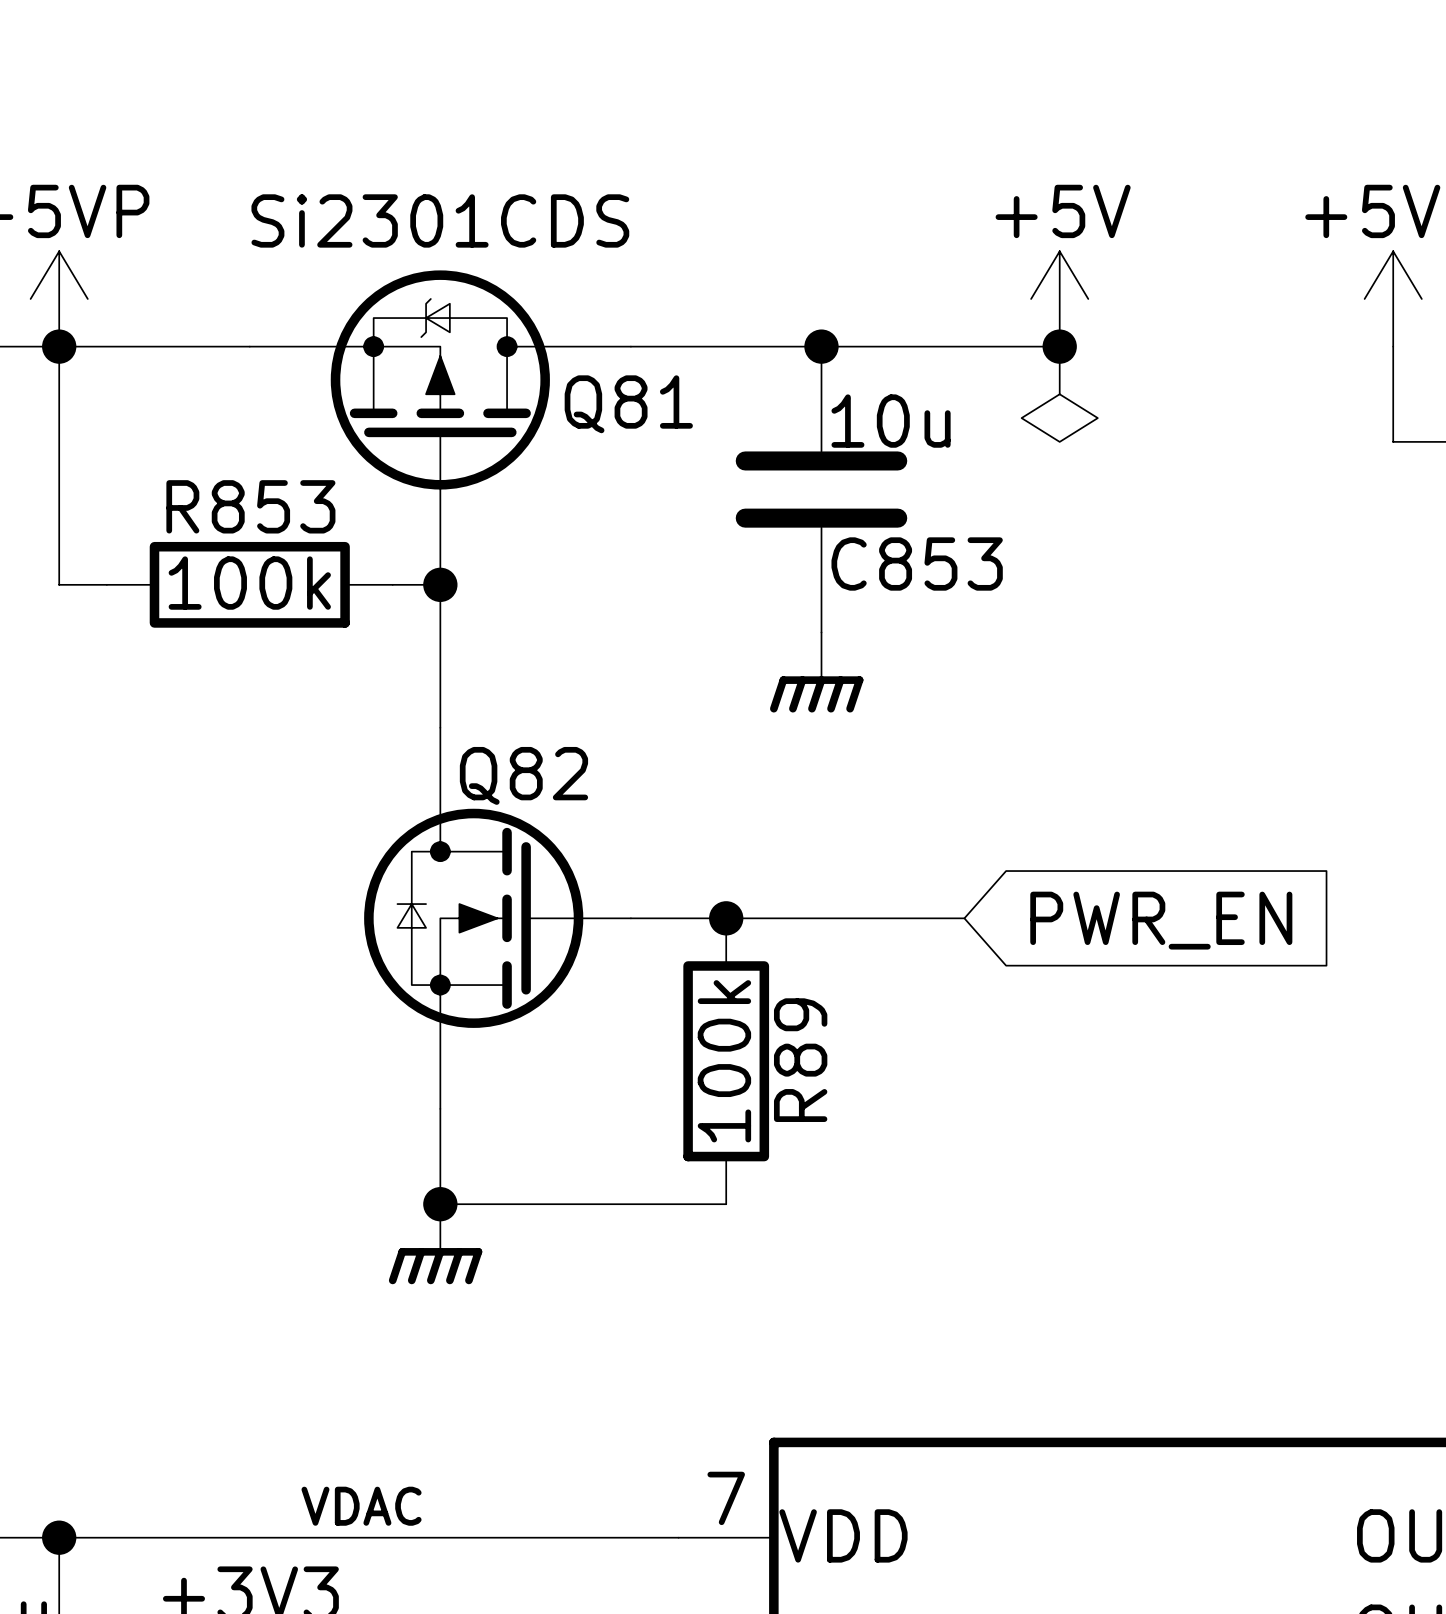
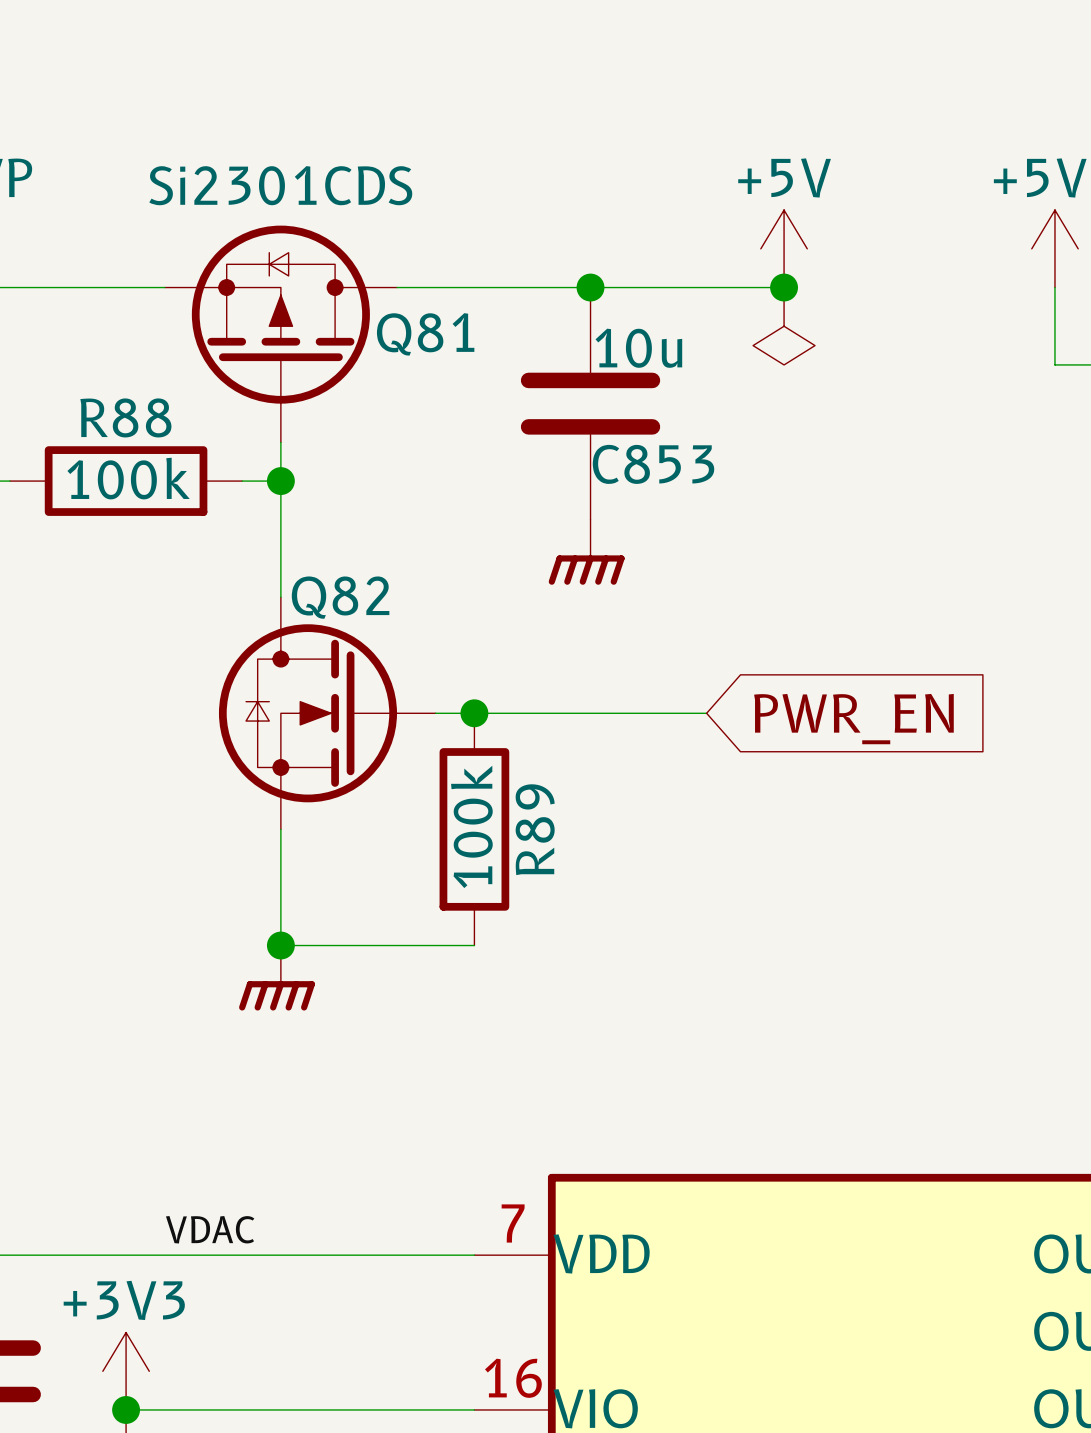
Q81 symbol: [249, 270, 631, 585] -> [164, 225, 398, 443]
R853 name: R853 (250, 506) -> R88 (125, 417)
Q82 symbol: [364, 727, 727, 1109] -> [218, 597, 436, 830]
wire: none -> (435, 713) (706, 713)
wire: (726, 918) (964, 918) -> none
junction position: (726, 918) -> (474, 713)
global label position: PWR_EN (1161, 920) -> PWR_EN (853, 719)
R89 position: (726, 1061) -> (474, 829)
wire: (440, 1156) (440, 1204) (726, 1204) -> (280, 945) (474, 945)
junction position: (440, 1204) -> (280, 945)
power symbol position: (435, 1244) -> (277, 978)

